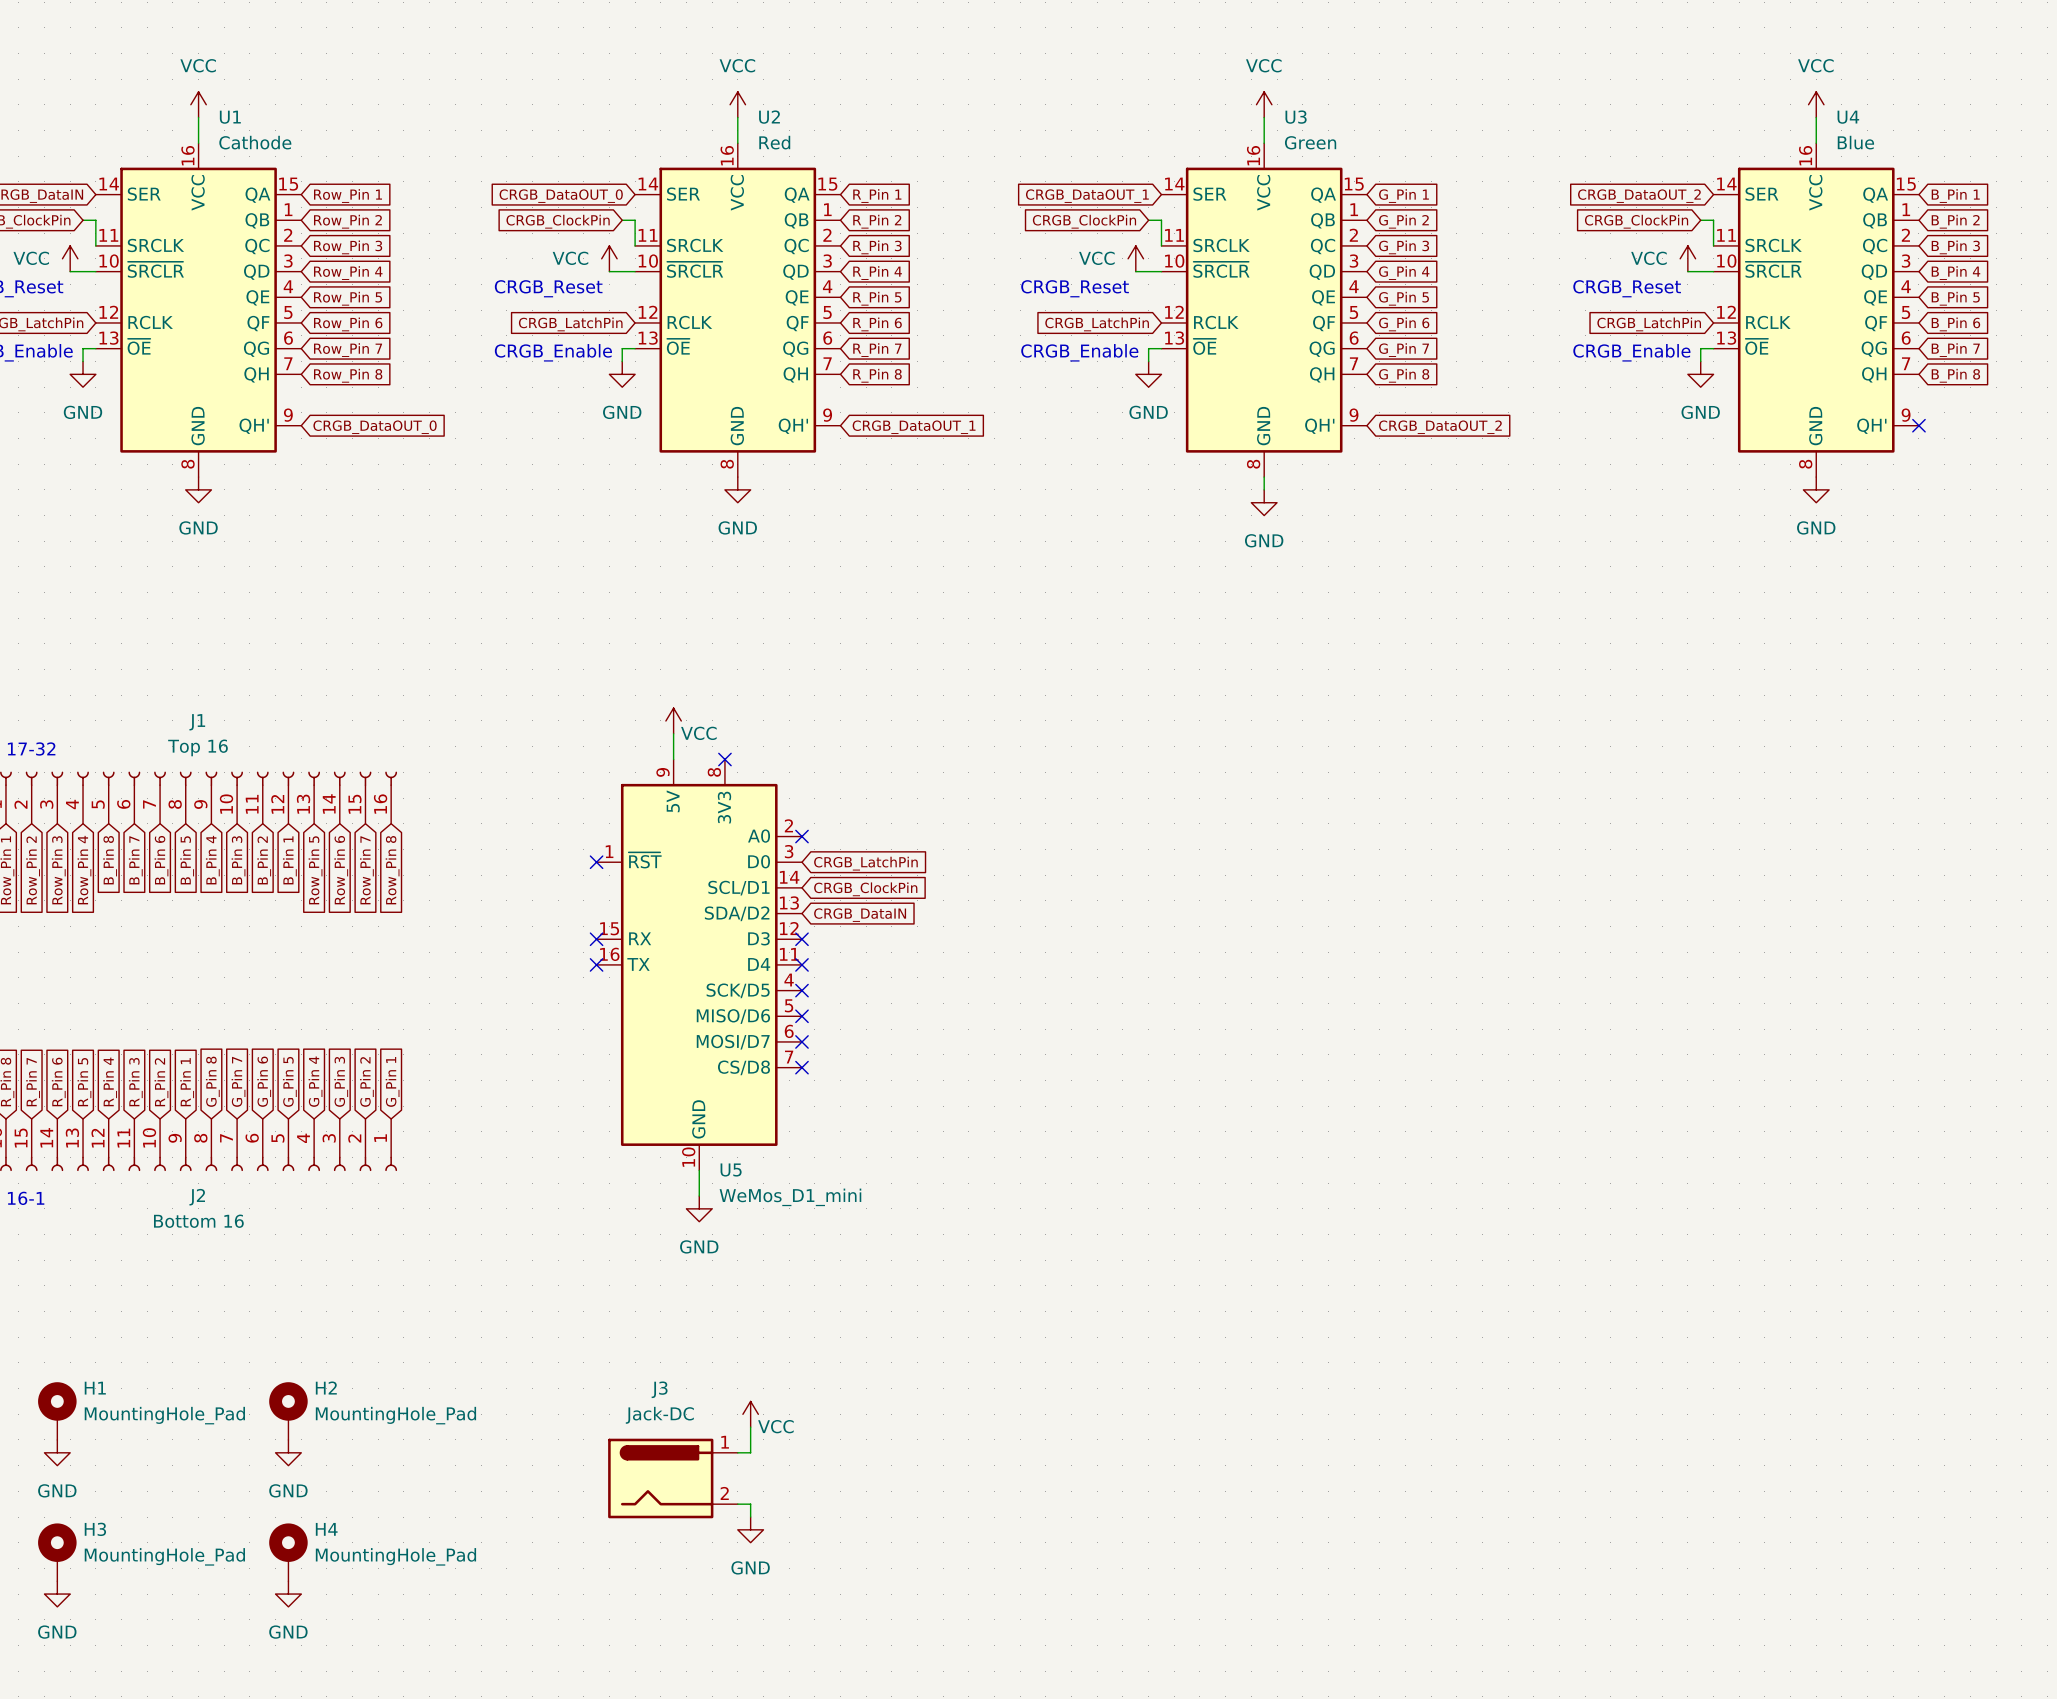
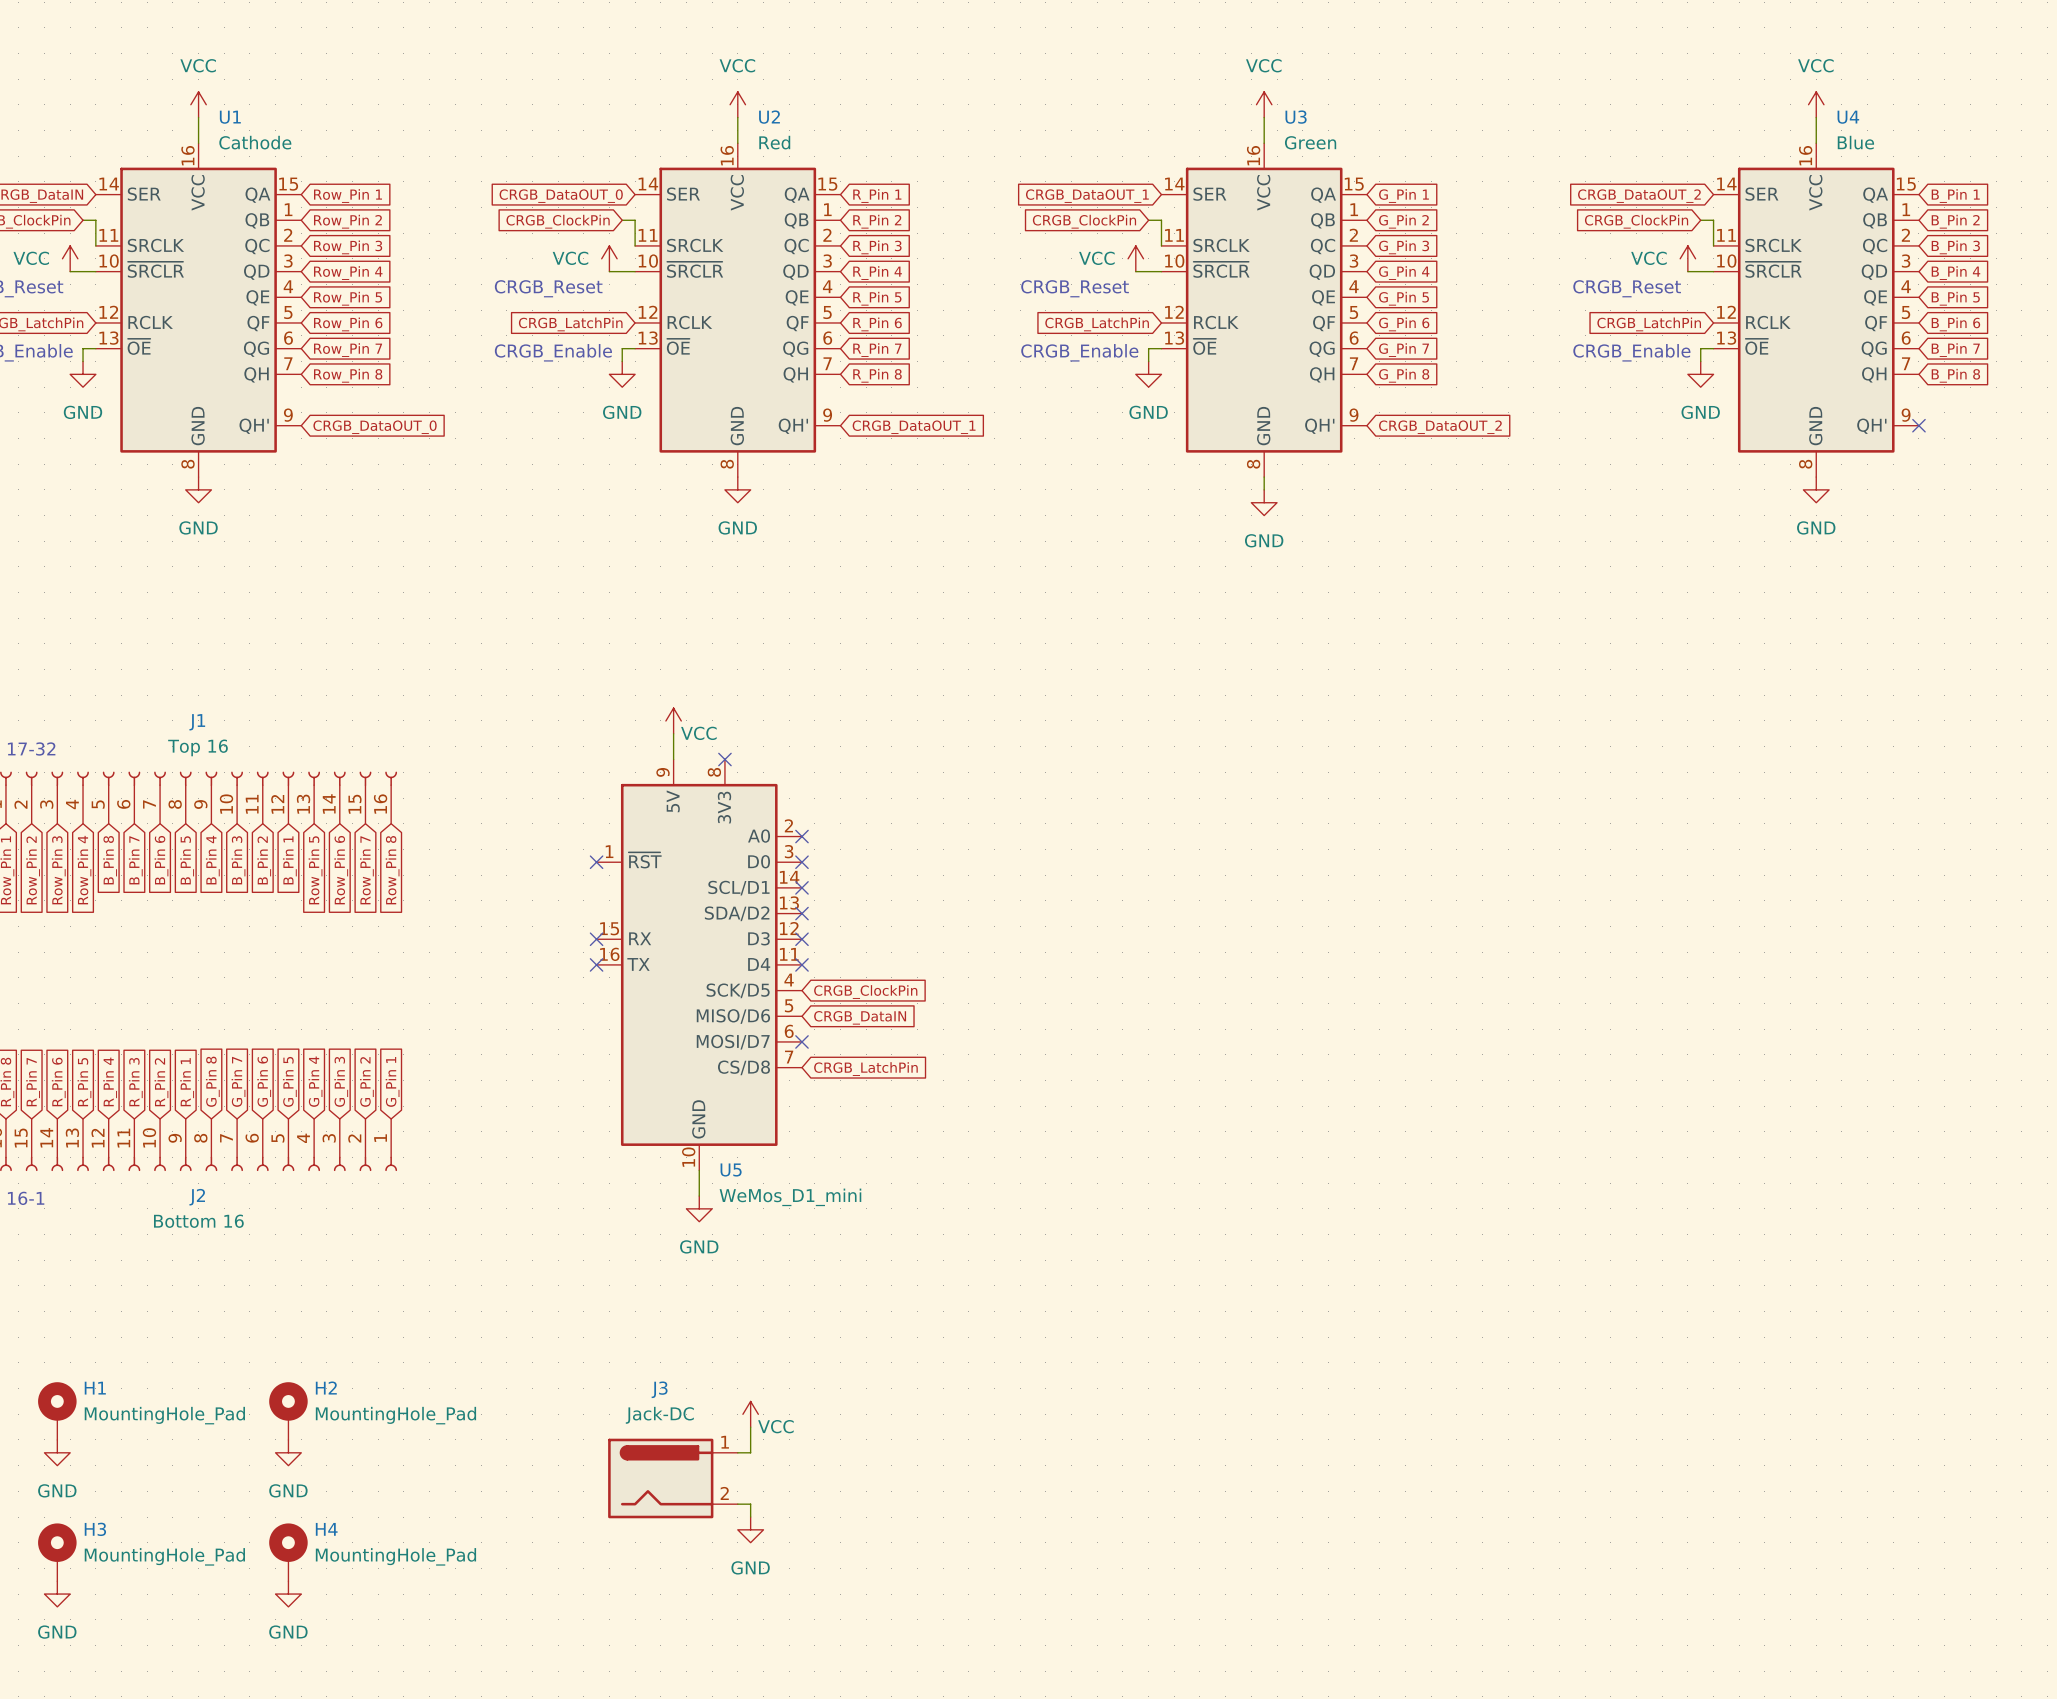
no-connect mark: none -> (801, 862)
global label position: CRGB_LatchPin (865, 863) -> CRGB_LatchPin (865, 1069)
no-connect mark: none -> (801, 887)
global label position: CRGB_ClockPin (865, 889) -> CRGB_ClockPin (865, 992)
no-connect mark: none -> (801, 913)
global label position: CRGB_DataIN (860, 915) -> CRGB_DataIN (860, 1017)
no-connect mark: (801, 990) -> none
no-connect mark: (801, 1016) -> none
no-connect mark: (801, 1067) -> none

